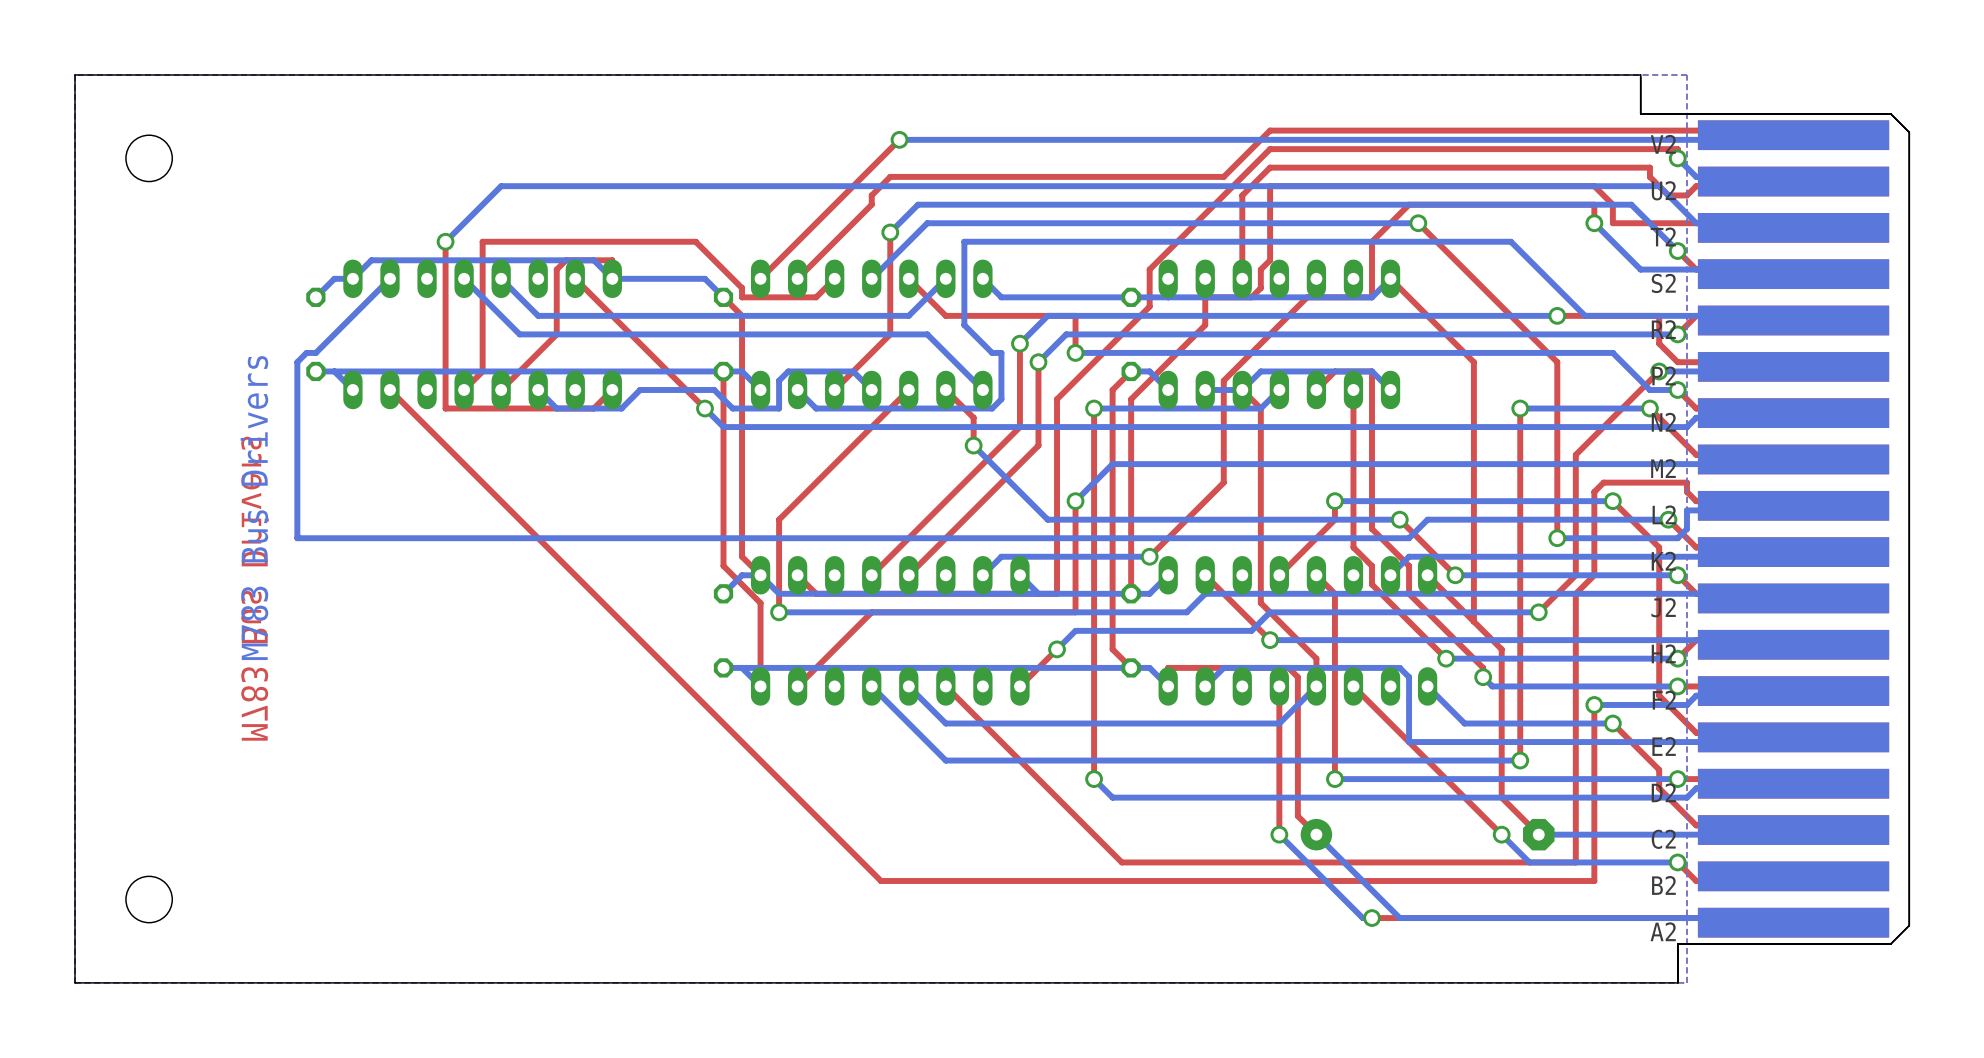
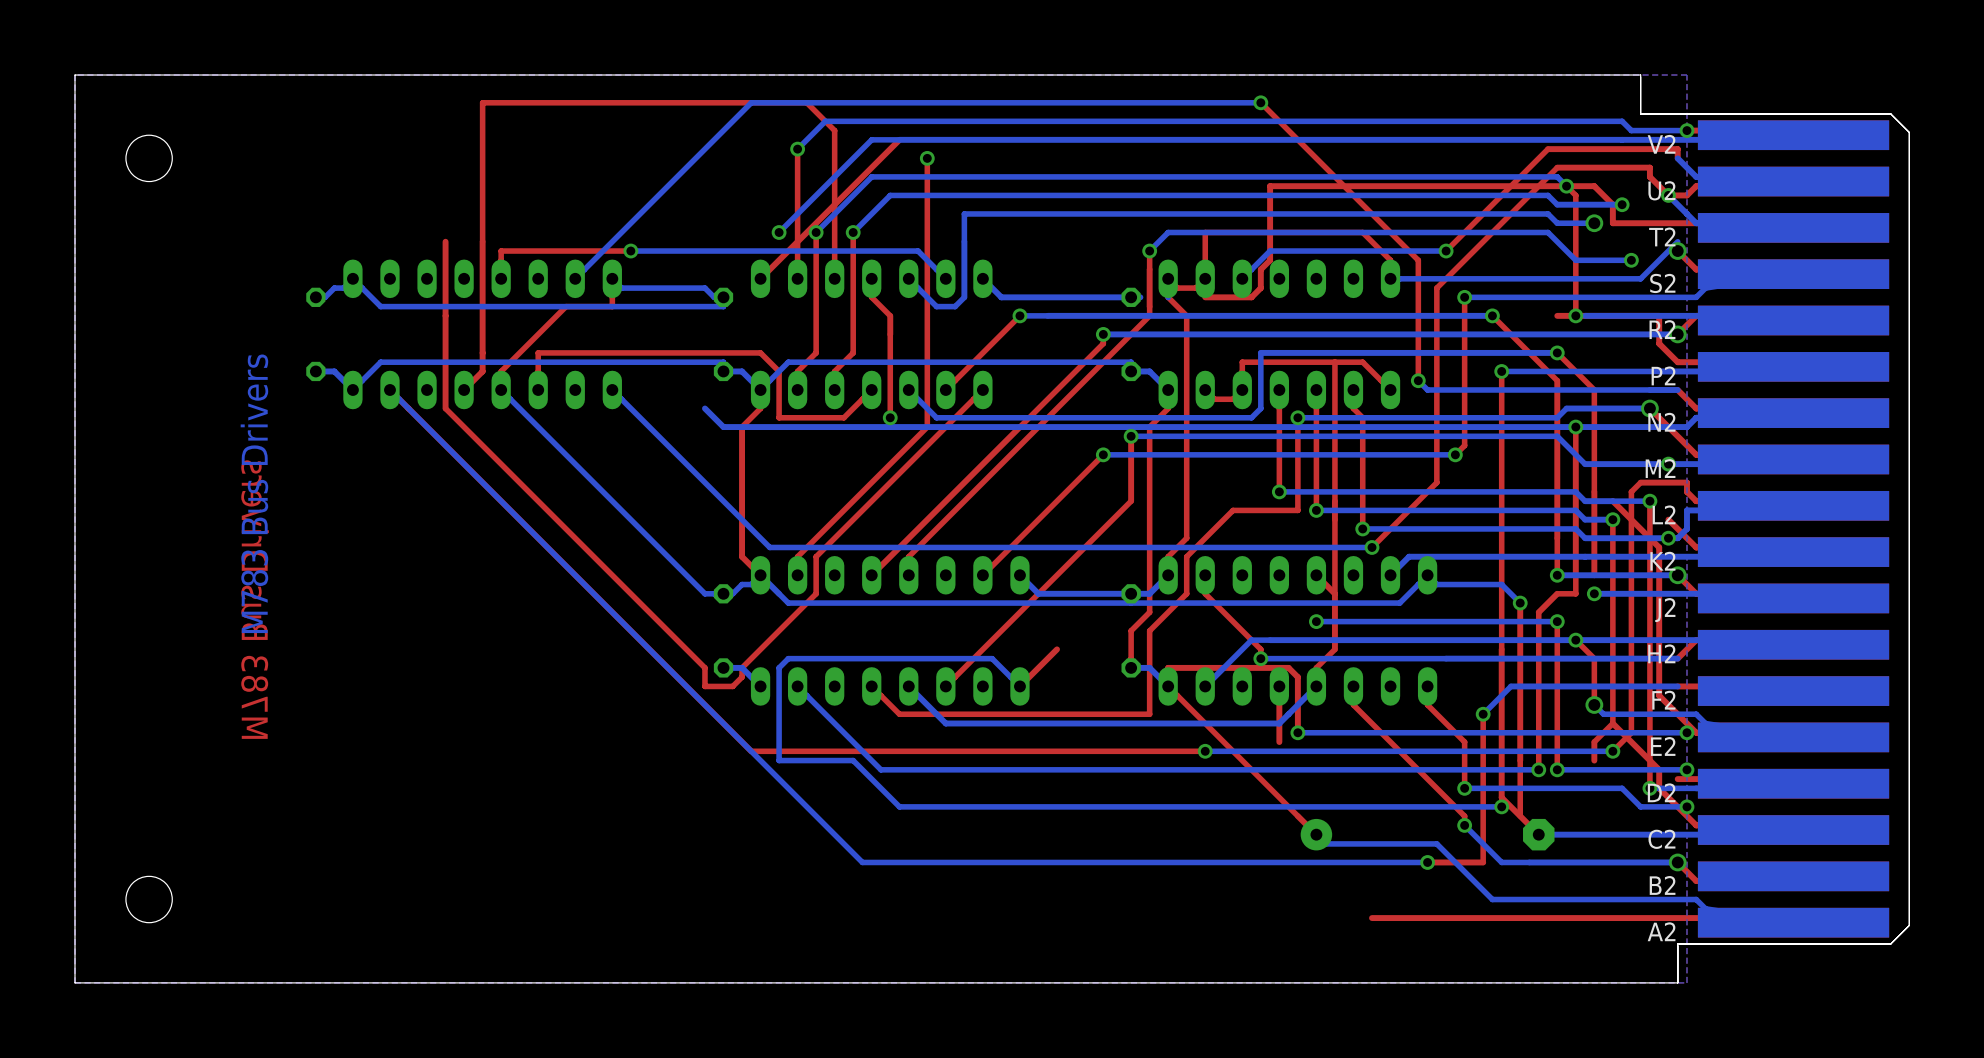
bottom track: none -> (1260, 102) (751, 102) (575, 278)
top track: none -> (1260, 102) (1418, 260) (1418, 380)
via: none -> (1260, 102)
bottom track: none -> (1686, 130) (1631, 130) (1622, 121) (825, 121) (797, 149)
top track: (1686, 130) (1270, 130) (1223, 176) (890, 176) (871, 195) (871, 204) (797, 278) -> (797, 149) (797, 278)
via: none -> (1686, 130)
bottom track: none -> (899, 139) (871, 139) (779, 232)
via: (899, 139) -> none
via: none -> (797, 149)
top track: (1548, 149) (1270, 149) (1149, 269) -> (1548, 149) (1446, 251)
top track: none -> (927, 158) (927, 427) (797, 556) (797, 575)
via: none -> (927, 158)
via: (1677, 158) -> none
top track: (1557, 167) (1270, 167) (1242, 195) (1242, 278) -> (1557, 167) (1436, 288) (1436, 482) (1372, 547)
bottom track: none -> (1566, 186) (1557, 176) (871, 176) (816, 232)
top track: none -> (1566, 186) (1575, 195) (1575, 315)
via: none -> (1566, 186)
bottom track: (1668, 195) (1659, 186) (501, 186) (445, 241) -> none
via: none -> (1668, 195)
bottom track: (1557, 204) (918, 204) (890, 232) -> (1557, 204) (1548, 195) (890, 195) (853, 232)
bottom track: (1622, 204) (1631, 204) (1677, 251) -> none
via: none -> (1622, 204)
bottom track: (1418, 223) (927, 223) (871, 278) -> none
top track: (1418, 223) (1557, 362) (1557, 380) -> (1492, 315) (1557, 380)
via: (1418, 223) -> none
bottom track: (1594, 223) (1640, 269) (1788, 269) (1793, 274) -> (1464, 297) (1696, 297) (1705, 288) (1793, 274)
top track: (1594, 223) (1594, 204) (1409, 204) (1372, 241) (1372, 297) (1307, 297) (1223, 380) (1223, 482) (1149, 556) -> none
via: none -> (779, 232)
top track: none -> (816, 232) (816, 352) (797, 371) (797, 389)
via: none -> (816, 232)
top track: none -> (853, 232) (853, 352) (834, 371) (834, 389)
via: none -> (853, 232)
top track: (890, 232) (890, 315) -> (871, 278) (871, 297) (890, 315)
via: (890, 232) -> none
via: (445, 241) -> none
top track: (482, 241) (695, 241) (742, 288) (742, 297) (816, 297) (834, 278) -> (482, 241) (482, 102) (806, 102) (834, 130) (834, 278)
bottom track: (964, 241) (1510, 241) (1585, 315) -> (964, 241) (964, 213) (1548, 213) (1557, 223) (1594, 223)
top track: none -> (630, 251) (501, 251) (501, 278)
via: none -> (630, 251)
bottom track: none -> (1149, 251) (1168, 232) (1548, 232) (1575, 260) (1631, 260)
top track: none -> (1149, 251) (1149, 269)
via: none -> (1149, 251)
bottom track: none -> (1446, 251) (1270, 251) (1242, 278)
via: none -> (1446, 251)
via: none -> (1631, 260)
bottom track: (389, 278) (315, 352) (306, 352) (297, 362) (297, 538) (1409, 538) (1427, 519) (1585, 519) -> (1316, 510) (1575, 510) (1585, 519)
bottom track: (464, 278) (519, 334) (927, 334) (982, 389) -> none
top track: (575, 278) (704, 408) -> none
top track: (612, 278) (612, 260) (566, 260) (556, 269) (556, 334) (501, 389) -> (612, 278) (612, 306) (566, 306) (501, 371) (501, 389)
top track: (908, 278) (945, 315) (1075, 315) (1075, 352) -> none
bottom track: (945, 278) (908, 315) (538, 315) (501, 278) -> (945, 278) (918, 251) (630, 251)
top track: (1205, 278) (1205, 325) (1131, 399) (1131, 436) -> none
bottom track: (1390, 278) (1372, 297) (1140, 297) -> (1390, 278) (1640, 278) (1677, 241)
top track: (1390, 278) (1473, 362) (1473, 621) -> (1390, 278) (1390, 260) (1362, 232) (1205, 232) (1205, 278) (1195, 288) (1177, 288) (1168, 278) (1168, 297) (1186, 315) (1186, 538) (1168, 556) (1168, 575)
bottom track: (723, 297) (704, 278) (612, 278) (593, 260) (371, 260) (352, 278) (334, 278) (315, 297) -> (612, 278) (621, 288) (704, 288) (714, 297) (723, 297) (723, 306) (380, 306) (352, 278) (343, 288) (334, 288) (325, 297) (315, 297)
top track: (723, 297) (742, 315) (742, 427) -> (760, 389) (760, 408) (742, 427)
bottom track: (964, 297) (964, 325) (992, 352) (1001, 352) (1001, 399) (992, 408) (816, 408) (797, 389) -> (964, 297) (955, 306) (936, 306) (908, 278)
top track: none -> (1464, 297) (1464, 445) (1455, 454)
via: none -> (1464, 297)
top track: (1149, 306) (1057, 399) (1057, 593) (816, 593) (797, 575) -> (1149, 306) (1149, 315) (908, 556) (908, 575)
via: none -> (1019, 315)
bottom track: (1047, 315) (1019, 343) -> (1047, 315) (1019, 315)
via: none -> (1492, 315)
bottom track: (1557, 315) (1492, 315) -> none
via: (1557, 315) -> none
via: none -> (1575, 315)
top track: (890, 334) (834, 389) -> (890, 334) (890, 417)
bottom track: (1103, 334) (1066, 334) (1038, 362) -> none
via: none -> (1103, 334)
top track: (1019, 343) (1019, 427) -> (1103, 334) (1103, 343) (1019, 427)
via: (1019, 343) -> none
via: (1075, 352) -> none
bottom track: (1260, 352) (1075, 352) -> (1260, 352) (1260, 408) (1251, 417) (936, 417) (908, 389)
bottom track: (1557, 352) (1612, 352) (1649, 389) -> (1418, 380) (1427, 389) (1649, 389)
via: none -> (1557, 352)
top track: (1038, 362) (1038, 445) (908, 575) -> none
via: (1038, 362) -> none
top track: none -> (1334, 362) (1334, 501)
bottom track: (723, 371) (334, 371) -> (723, 371) (723, 362) (380, 362) (352, 389)
top track: (723, 371) (723, 566) (760, 603) (760, 686) -> none
bottom track: none -> (1131, 371) (1131, 362) (788, 362) (760, 389)
top track: (1131, 371) (1112, 389) (1112, 649) (1131, 667) -> (1168, 389) (1168, 408) (1149, 427) (1149, 612) (1131, 630) (1131, 667)
via: none -> (1501, 371)
bottom track: none -> (1659, 371) (1501, 371)
top track: (1659, 371) (1575, 454) -> (1575, 427) (1575, 454)
via: (1659, 371) -> none
via: none -> (1418, 380)
bottom track: none -> (389, 389) (862, 862) (1427, 862)
bottom track: none -> (612, 389) (769, 547) (1372, 547)
top track: (612, 389) (593, 408) (445, 408) -> (982, 389) (816, 556) (816, 593) (742, 667) (742, 677) (732, 686) (704, 686) (704, 667) (445, 408)
bottom track: (871, 389) (853, 371) (788, 371) (779, 380) (779, 408) (732, 408) (714, 389) (640, 389) (621, 408) (556, 408) (538, 389) -> none
top track: none -> (871, 389) (843, 417) (779, 417) (779, 371) (760, 352) (538, 352) (538, 389)
top track: (908, 389) (779, 519) (779, 612) -> none
top track: (945, 389) (973, 417) (973, 445) -> (945, 389) (1019, 315)
top track: (1242, 389) (1260, 408) (1260, 603) (1316, 658) (1316, 667) -> none
bottom track: (1279, 389) (1260, 408) (1094, 408) -> none
top track: none -> (1279, 389) (1279, 491)
top track: (1316, 389) (1334, 371) (1372, 371) (1372, 528) (1409, 566) (1409, 593) (1483, 667) (1483, 677) -> (1316, 389) (1316, 510)
bottom track: (1390, 389) (1372, 371) (1260, 371) (1242, 389) (1205, 389) -> none
top track: none -> (1390, 389) (1362, 362) (1242, 362) (1242, 389) (1233, 399) (1214, 399) (1205, 389)
via: (1677, 389) -> none
via: (704, 408) -> none
top track: (1094, 408) (1094, 779) -> none
via: (1094, 408) -> none
top track: (1353, 408) (1353, 547) (1372, 566) (1372, 584) (1446, 658) -> (1353, 408) (1362, 417) (1362, 528)
top track: (1520, 408) (1520, 603) -> none
via: (1520, 408) -> none
bottom track: (1566, 408) (1520, 408) -> (1566, 408) (1557, 417) (1297, 417)
via: none -> (890, 417)
top track: none -> (1297, 417) (1297, 510) (1233, 510) (1186, 556) (1186, 593) (1149, 630) (1149, 714) (899, 714) (871, 686)
via: none -> (1297, 417)
via: none -> (1575, 427)
via: none -> (1131, 436)
bottom track: (973, 445) (1047, 519) (1399, 519) -> none
via: (973, 445) -> none
top track: none -> (1103, 454) (982, 575)
via: none -> (1103, 454)
bottom track: none -> (1455, 454) (1103, 454)
via: none -> (1455, 454)
bottom track: (1585, 464) (1112, 464) (1075, 501) -> (1585, 464) (1557, 436) (1131, 436)
via: none -> (1668, 464)
top track: (1640, 482) (1603, 482) (1594, 491) -> (1557, 352) (1594, 389) (1594, 491)
top track: none -> (1640, 482) (1631, 491) (1631, 732) (1612, 751)
via: none -> (1279, 491)
top track: (1075, 501) (1075, 612) (871, 612) (797, 686) -> none
via: (1075, 501) -> none
top track: (1131, 501) (1131, 593) -> (1131, 501) (945, 686)
via: (1334, 501) -> none
bottom track: (1585, 501) (1334, 501) -> (1585, 501) (1575, 491) (1279, 491)
via: (1612, 501) -> none
bottom track: none -> (1649, 501) (1612, 501)
top track: none -> (1649, 501) (1649, 788)
via: none -> (1649, 501)
via: none -> (1316, 510)
top track: (1334, 519) (1279, 575) -> (1334, 519) (1334, 593)
top track: (1399, 519) (1455, 575) -> none
via: (1399, 519) -> none
top track: none -> (1612, 519) (1612, 723) (1594, 742)
via: none -> (1612, 519)
bottom track: (1668, 519) (1612, 519) -> none
via: (1668, 519) -> none
via: none -> (1362, 528)
top track: none -> (1557, 538) (1557, 575)
via: (1557, 538) -> none
bottom track: (1585, 538) (1557, 538) -> (1585, 538) (1575, 528) (1362, 528)
via: none -> (1668, 538)
via: none -> (1372, 547)
bottom track: (1149, 556) (1001, 556) (982, 575) -> none
via: (1149, 556) -> none
bottom track: (760, 575) (742, 575) (723, 593) -> (760, 575) (751, 584) (742, 584) (732, 593) (704, 593) (501, 389)
top track: (1205, 575) (1270, 640) -> (1205, 575) (1205, 593) (1260, 649) (1260, 658)
top track: (1427, 575) (1501, 649) -> (1501, 371) (1501, 649)
via: (1455, 575) -> none
bottom track: (1557, 575) (1455, 575) -> none
via: none -> (1557, 575)
top track: (1575, 575) (1557, 593) -> (1575, 575) (1575, 593) (1557, 593)
top track: (1594, 575) (1575, 593) (1575, 862) (1483, 862) -> (1483, 714) (1483, 862)
bottom track: (1038, 593) (779, 593) -> (1520, 603) (1501, 584) (1436, 584) (1427, 575) (1399, 603) (788, 603) (779, 593)
bottom track: (1594, 593) (1205, 593) (1186, 612) (779, 612) -> none
via: none -> (1594, 593)
via: none -> (1520, 603)
via: (779, 612) -> none
bottom track: (1538, 612) (1270, 612) (1251, 630) (1075, 630) (1057, 649) -> none
top track: none -> (1538, 612) (1538, 769)
via: (1538, 612) -> none
via: none -> (1316, 621)
bottom track: none -> (1557, 621) (1316, 621)
top track: none -> (1557, 621) (1557, 769)
via: none -> (1557, 621)
via: (1270, 640) -> none
via: none -> (1575, 640)
via: (1057, 649) -> none
top track: (1334, 649) (1334, 779) -> (1334, 649) (1316, 667)
via: none -> (1260, 658)
bottom track: none -> (1446, 658) (1260, 658)
via: (1446, 658) -> none
via: (1677, 658) -> none
bottom track: (1131, 667) (742, 667) -> none
bottom track: (1223, 667) (1399, 667) (1409, 677) (1409, 742) (1788, 742) (1793, 737) -> (1223, 667) (1251, 640) (1270, 640)
bottom track: (1483, 677) (1492, 686) (1510, 686) -> (1483, 714) (1510, 686)
via: (1483, 677) -> none
bottom track: none -> (797, 686) (880, 769) (1538, 769)
bottom track: (871, 686) (945, 760) (1520, 760) -> none
top track: (945, 686) (1121, 862) (1427, 862) -> none
bottom track: none -> (1019, 686) (992, 658) (788, 658) (779, 667) (779, 760) (853, 760) (899, 806) (1501, 806)
top track: (1353, 686) (1501, 834) -> (1353, 686) (1353, 704) (1464, 816) (1464, 825)
bottom track: (1427, 686) (1464, 723) (1612, 723) -> none
top track: none -> (1427, 686) (1427, 704) (1464, 742) (1464, 788)
via: (1677, 686) -> none
bottom track: (1793, 691) (1788, 695) (1696, 695) (1686, 704) (1594, 704) -> (1793, 737) (1705, 723) (1696, 714) (1603, 714) (1594, 704)
top track: (1594, 704) (1594, 742) -> (1594, 704) (1594, 658) (1575, 640)
via: none -> (1483, 714)
via: (1612, 723) -> none
top track: (1297, 732) (1297, 816) -> (1168, 686) (1297, 816)
via: none -> (1297, 732)
bottom track: none -> (1686, 732) (1297, 732)
via: none -> (1686, 732)
top track: (1279, 742) (1279, 834) -> none
top track: (751, 751) (880, 880) (1594, 880) (1594, 760) -> (751, 751) (1205, 751)
via: none -> (1205, 751)
bottom track: none -> (1612, 751) (1205, 751)
via: none -> (1612, 751)
top track: none -> (1520, 760) (1520, 816)
via: (1520, 760) -> none
via: none -> (1538, 769)
via: none -> (1557, 769)
bottom track: none -> (1686, 769) (1557, 769)
bottom track: (1094, 779) (1112, 797) (1686, 797) (1696, 788) -> (1649, 788) (1696, 788)
via: (1094, 779) -> none
via: (1334, 779) -> none
bottom track: (1677, 779) (1334, 779) -> none
via position: (1677, 779) -> (1686, 769)
bottom track: none -> (1464, 788) (1622, 788) (1640, 806) (1686, 806)
via: none -> (1464, 788)
via: none -> (1649, 788)
via: none -> (1501, 806)
via: none -> (1686, 806)
via: none -> (1464, 825)
bottom track: (1279, 834) (1362, 918) (1372, 918) -> none
via: (1279, 834) -> none
bottom track: (1501, 834) (1529, 862) -> (1464, 825) (1501, 862) (1529, 862)
via: (1501, 834) -> none
bottom track: (1325, 843) (1399, 918) (1788, 918) (1793, 922) -> (1325, 843) (1436, 843) (1492, 899) (1696, 899) (1705, 908) (1793, 922)
via: none -> (1427, 862)
via: (1372, 918) -> none

